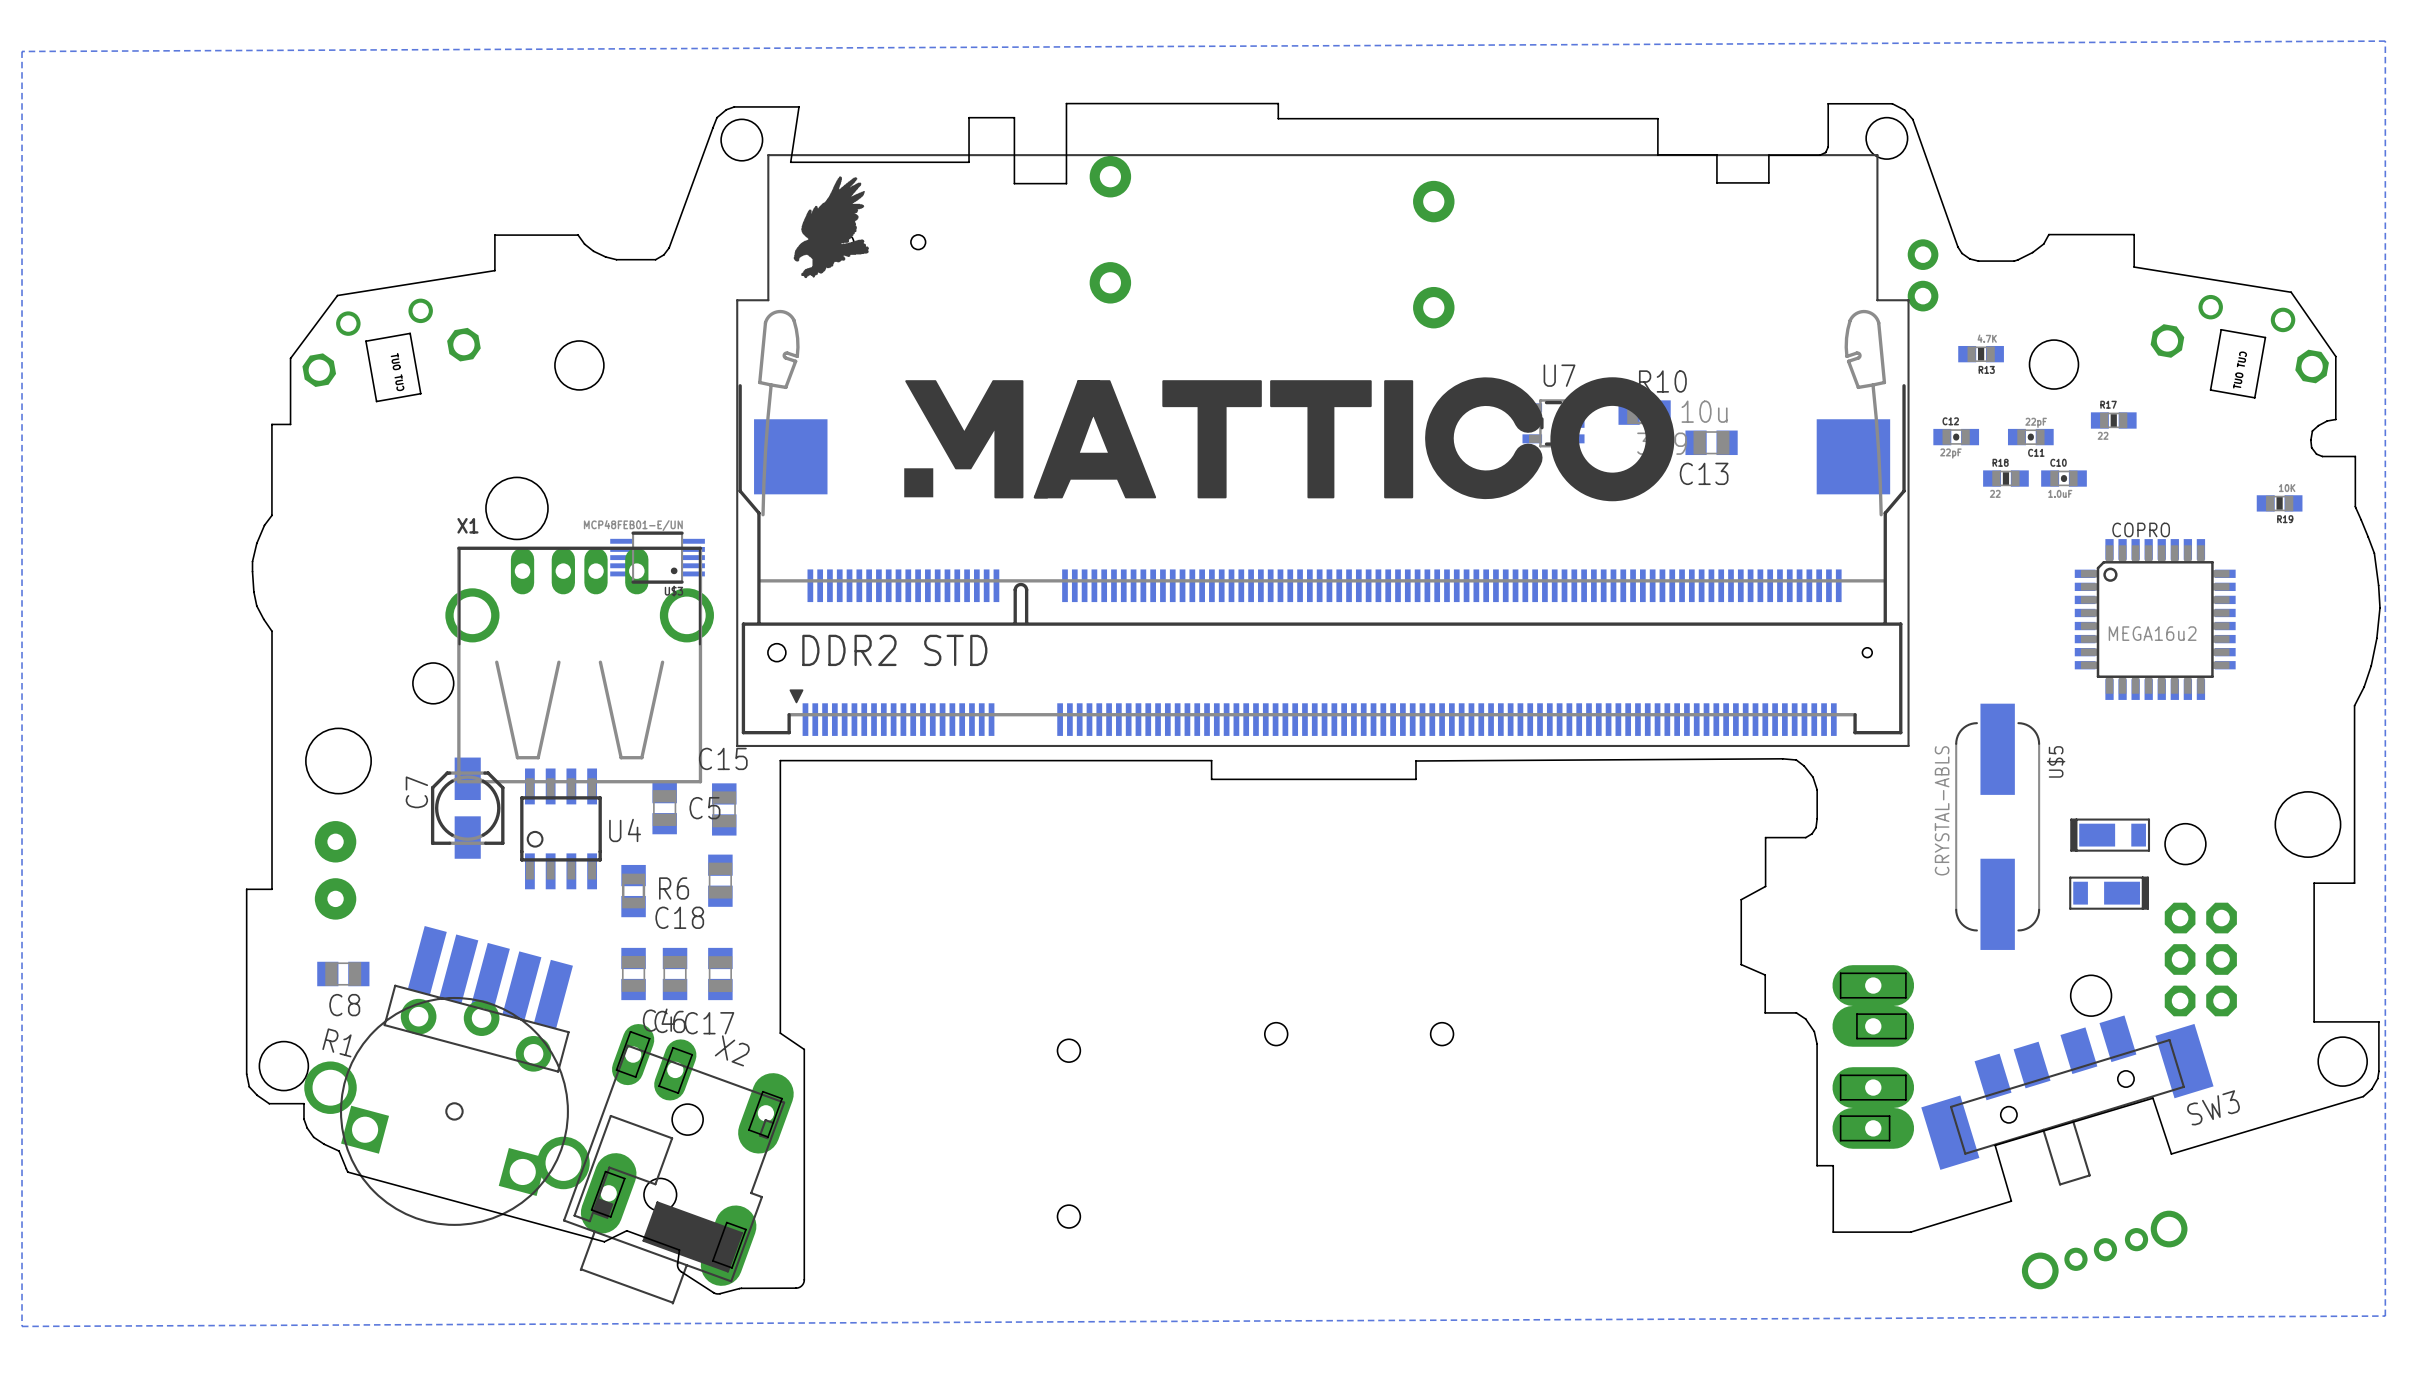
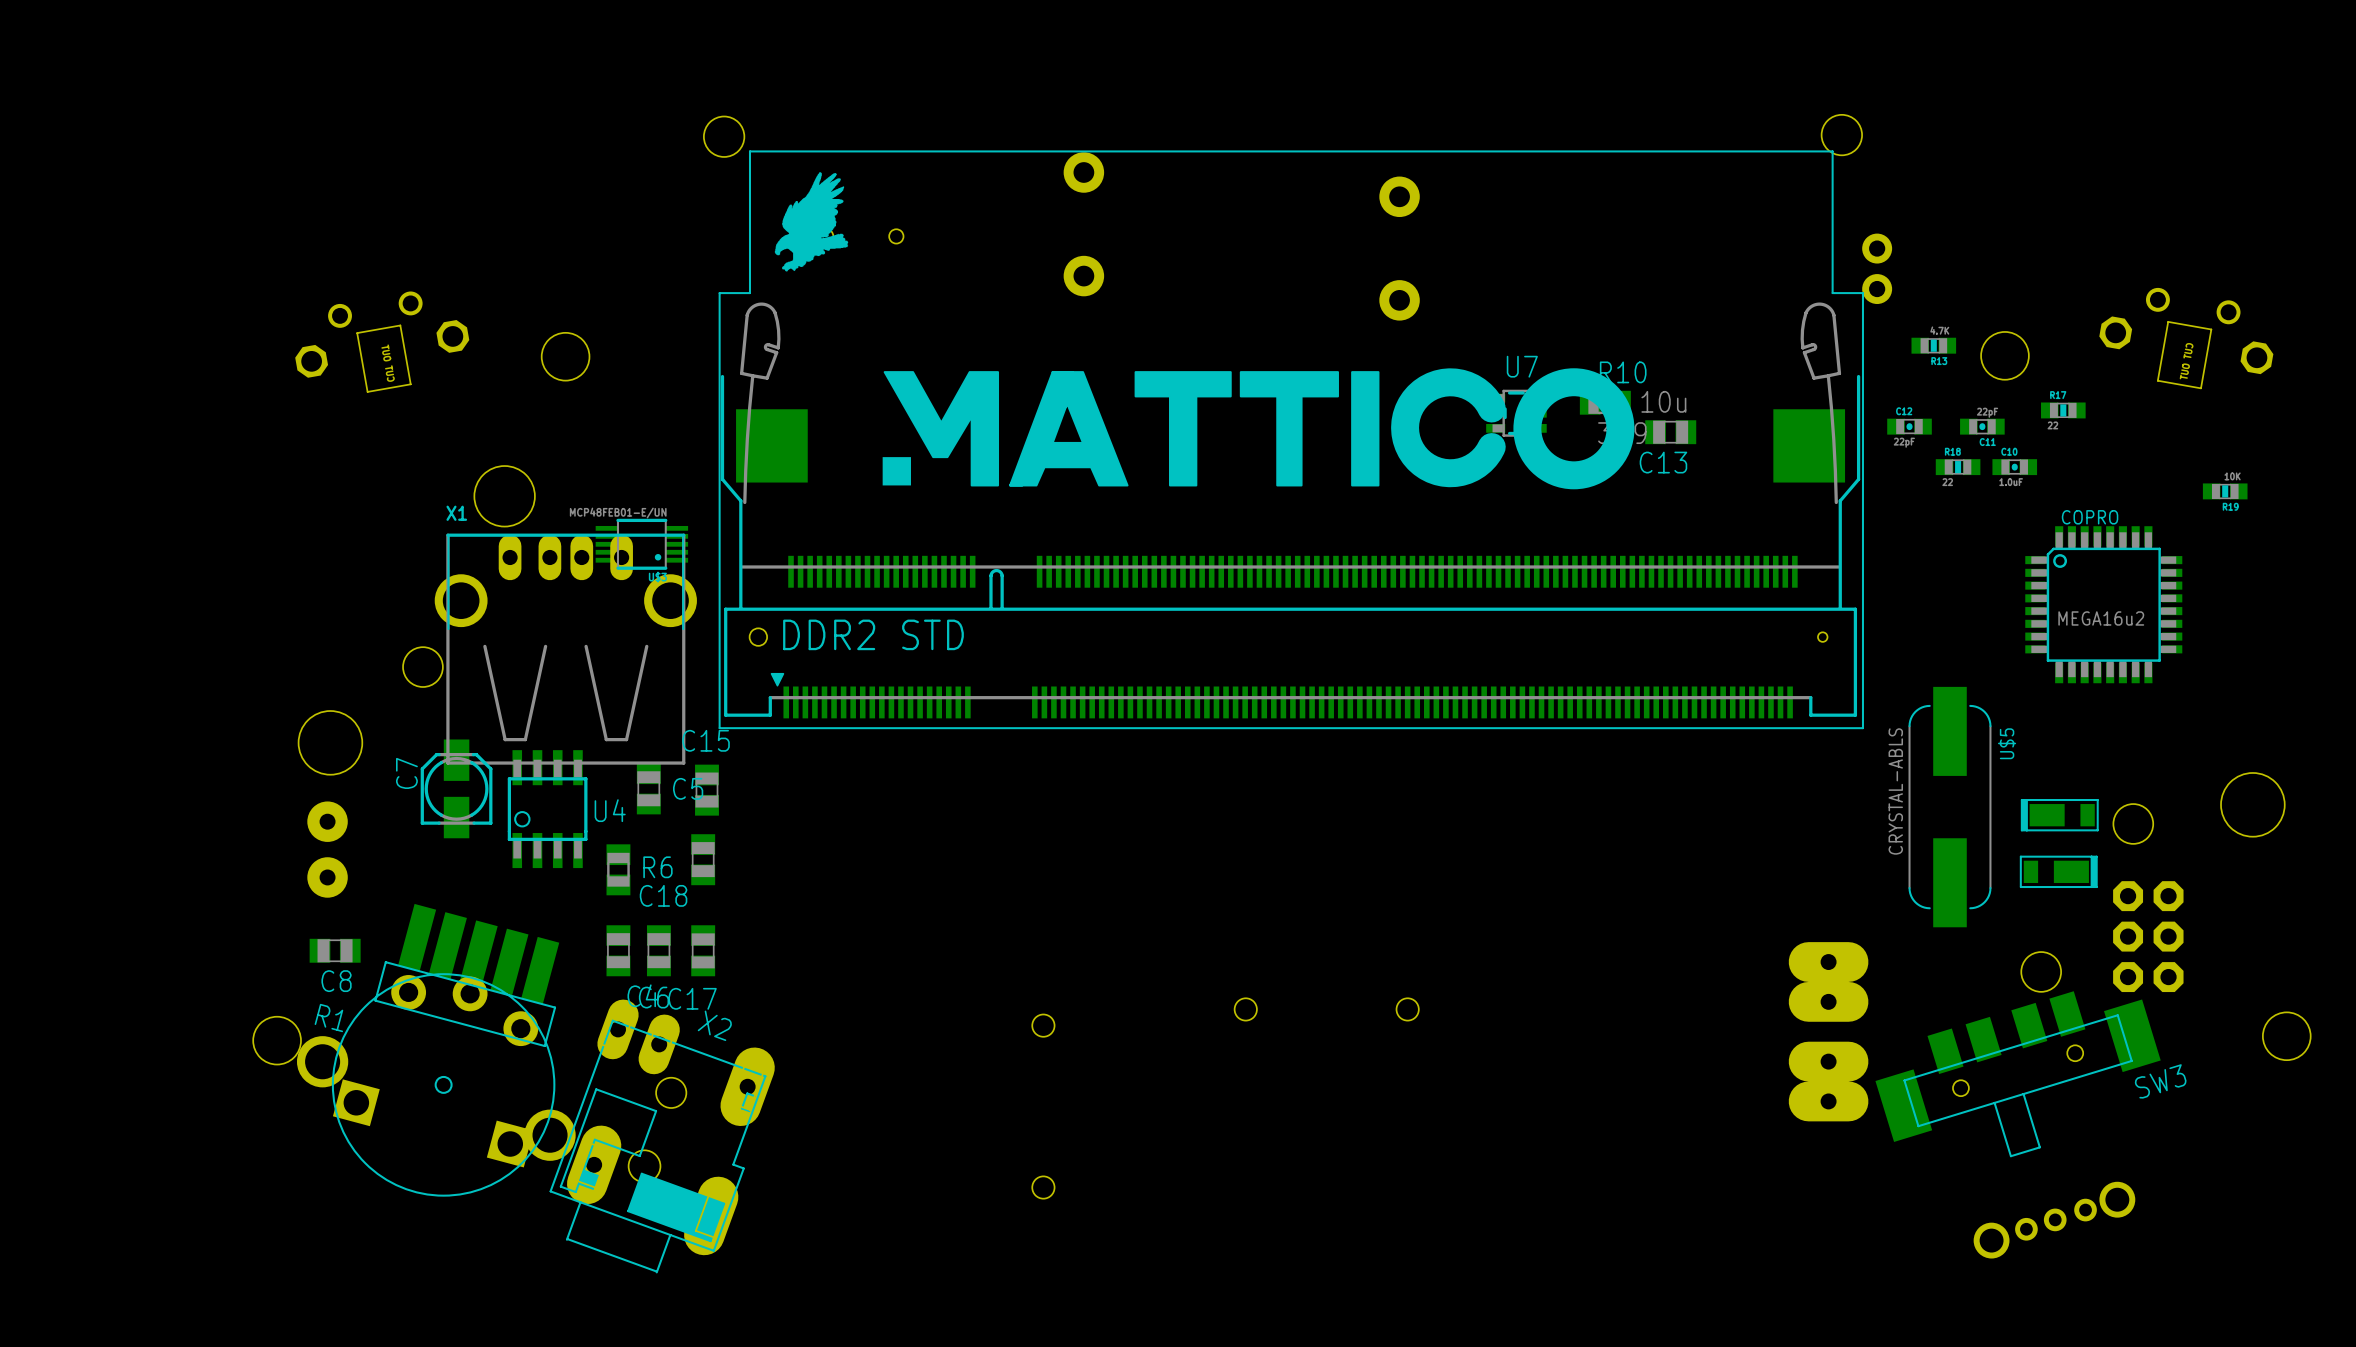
zone outline: (2385, 41) (22, 51) (22, 1326) (2385, 1316) (2385, 41) -> none
board edge: (1278, 103) (1278, 118) (1657, 118) (1657, 154) (1716, 154) (1716, 182) (1768, 182) (1768, 155) (1820, 155) (1825, 152) (1828, 147) (1828, 103) (1892, 103) (1904, 110) (1912, 119) (1957, 247) (1961, 253) (1969, 258) (1978, 261) (2014, 261) (2032, 252) (2043, 244) (2048, 234) (2134, 234) (2134, 267) (2291, 292) (2335, 356) (2335, 419) (2327, 421) (2312, 431) (2311, 447) (2316, 454) (2322, 456) (2355, 456) (2355, 506) (2374, 553) (2378, 585) (2379, 607) (2376, 638) (2371, 665) (2364, 687) (2354, 705) (2354, 883) (2314, 883) (2314, 1021) (2378, 1021) (2378, 1071) (2377, 1078) (2371, 1089) (2363, 1096) (2171, 1153) (2152, 1098) (1995, 1145) (2011, 1201) (1910, 1232) (1833, 1232) (1833, 1165) (1817, 1165) (1817, 1044) (1814, 1031) (1805, 1019) (1796, 1012) (1765, 1012) (1765, 975) (1741, 964) (1741, 899) (1765, 886) (1765, 837) (1805, 837) (1812, 833) (1816, 827) (1817, 789) (1813, 777) (1796, 760) (1415, 761) (1415, 779) (1211, 779) (1211, 760) (780, 760) (780, 1033) (804, 1049) (804, 1279) (800, 1287) (740, 1288) (715, 1293) (679, 1269) (677, 1264) (679, 1250) (626, 1230) (604, 1241) (347, 1172) (339, 1151) (313, 1137) (307, 1128) (303, 1119) (303, 1103) (269, 1103) (257, 1095) (249, 1086) (246, 1074) (246, 889) (271, 889) (271, 631) (256, 606) (253, 591) (252, 561) (256, 543) (264, 525) (271, 515) (271, 424) (290, 424) (290, 358) (337, 295) (494, 270) (494, 235) (578, 235) (584, 244) (605, 256) (616, 259) (655, 259) (663, 254) (669, 247) (717, 117) (726, 109) (734, 106) (799, 106) (790, 162) (969, 162) (969, 117) (1014, 117) (1014, 183) (1066, 183) (1066, 103) (1278, 103) -> none

